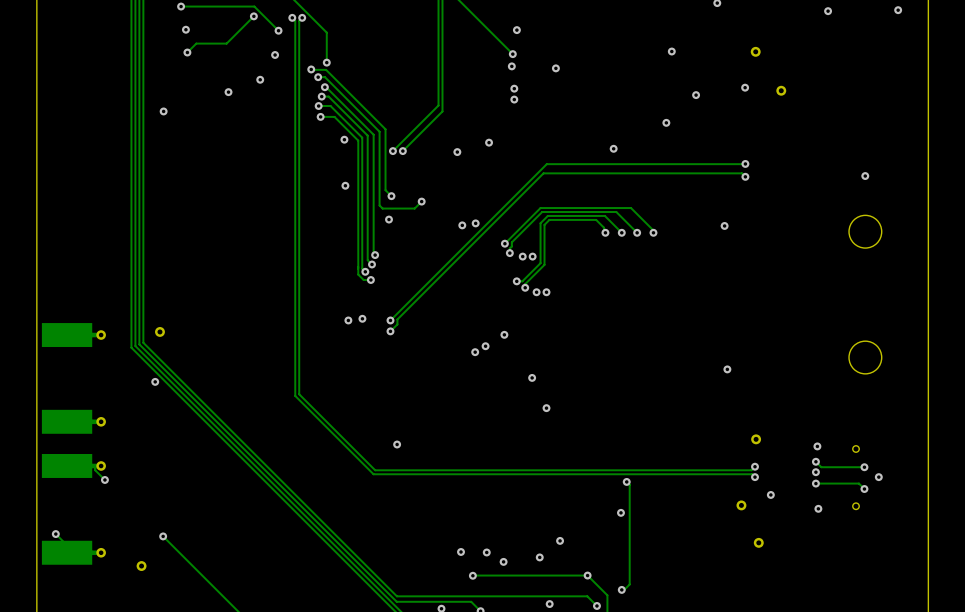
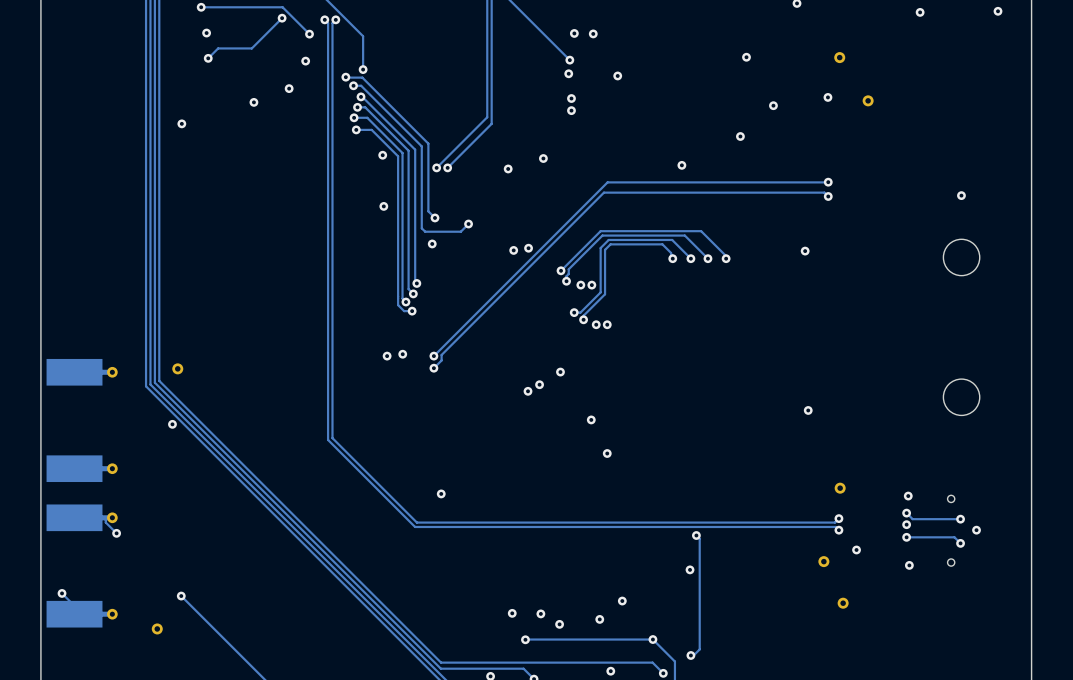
via: none -> (593, 33)

